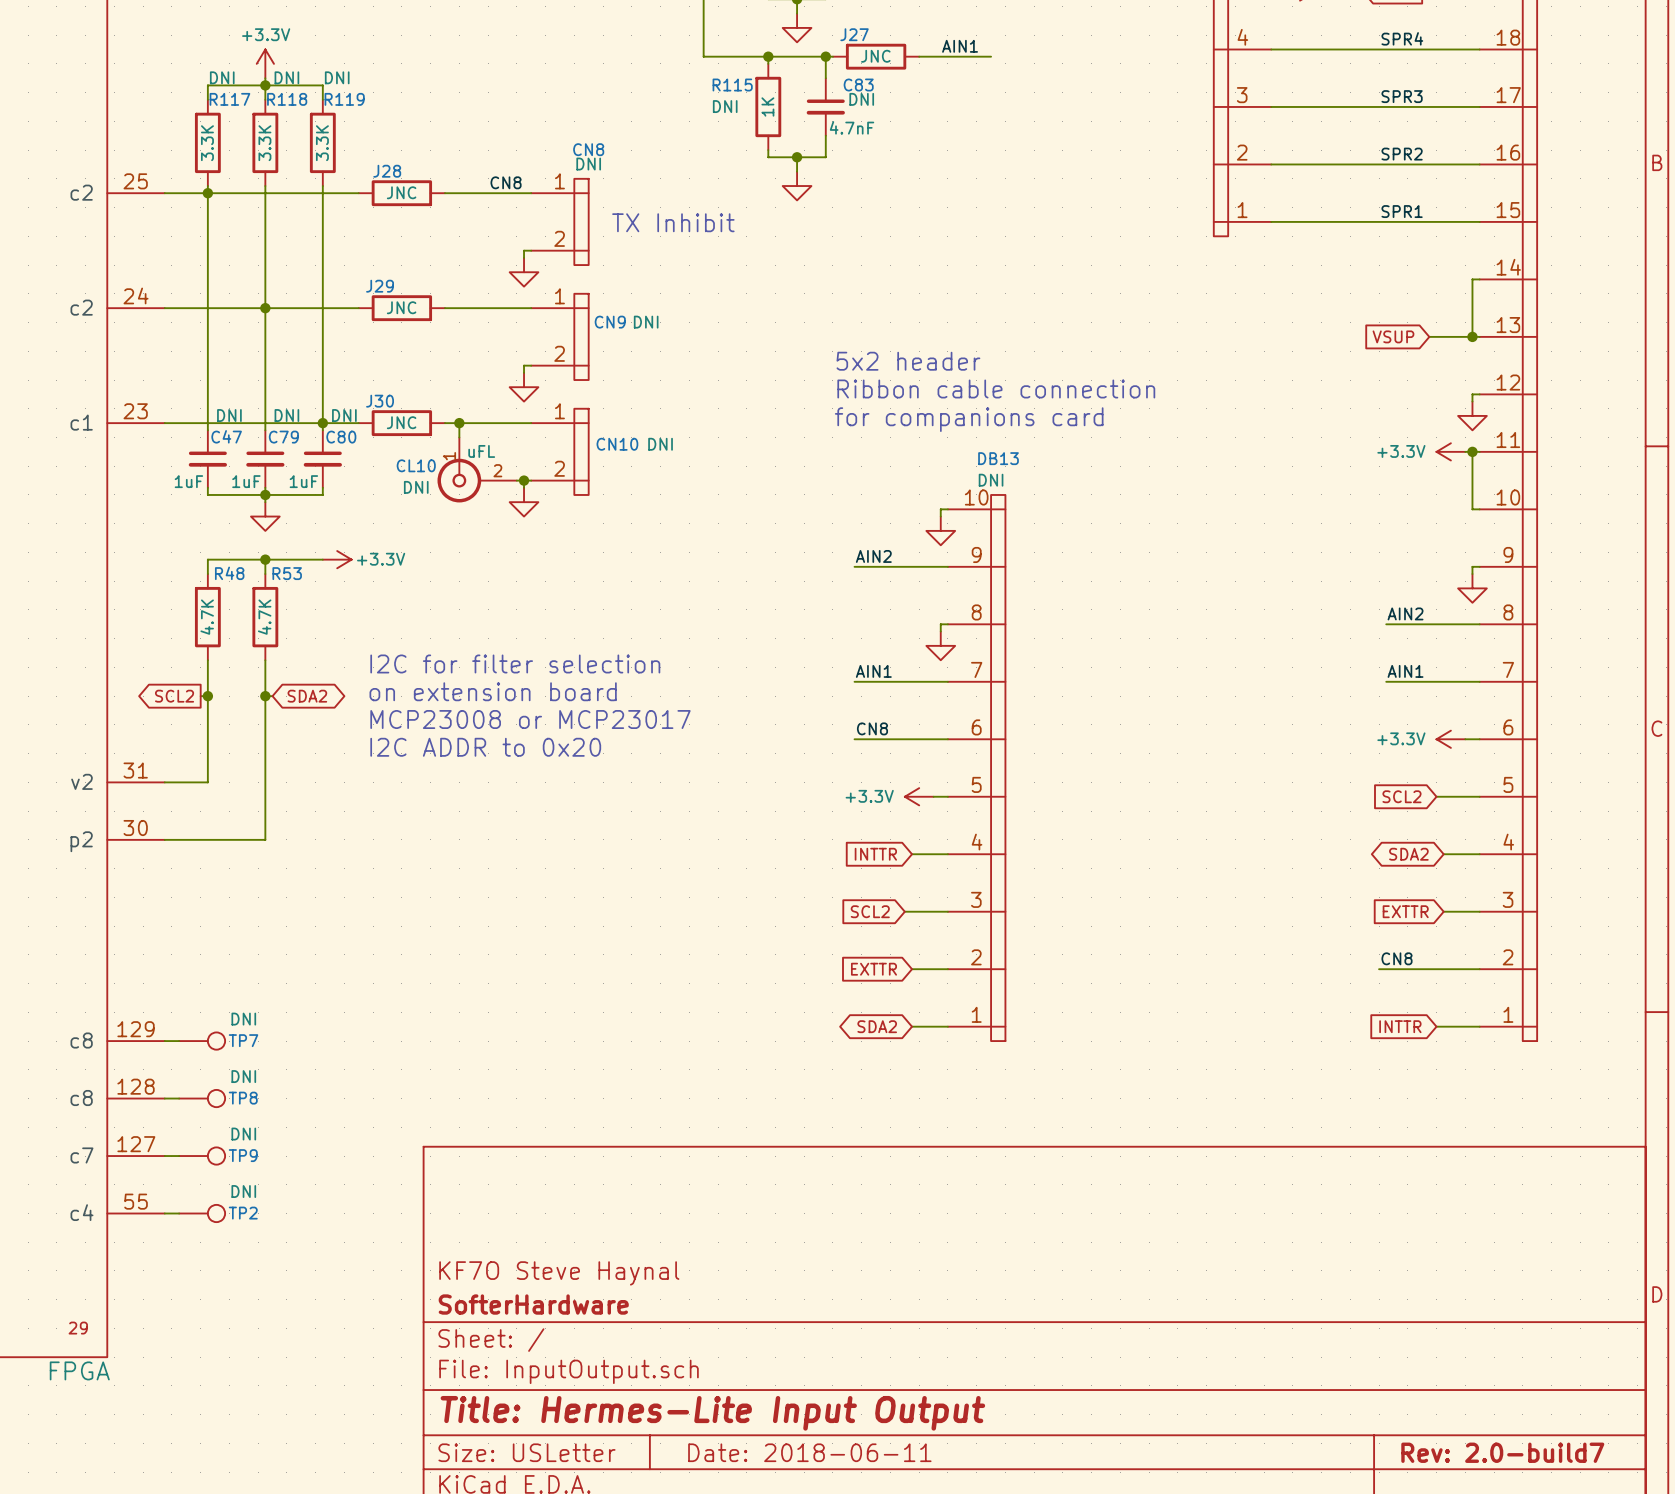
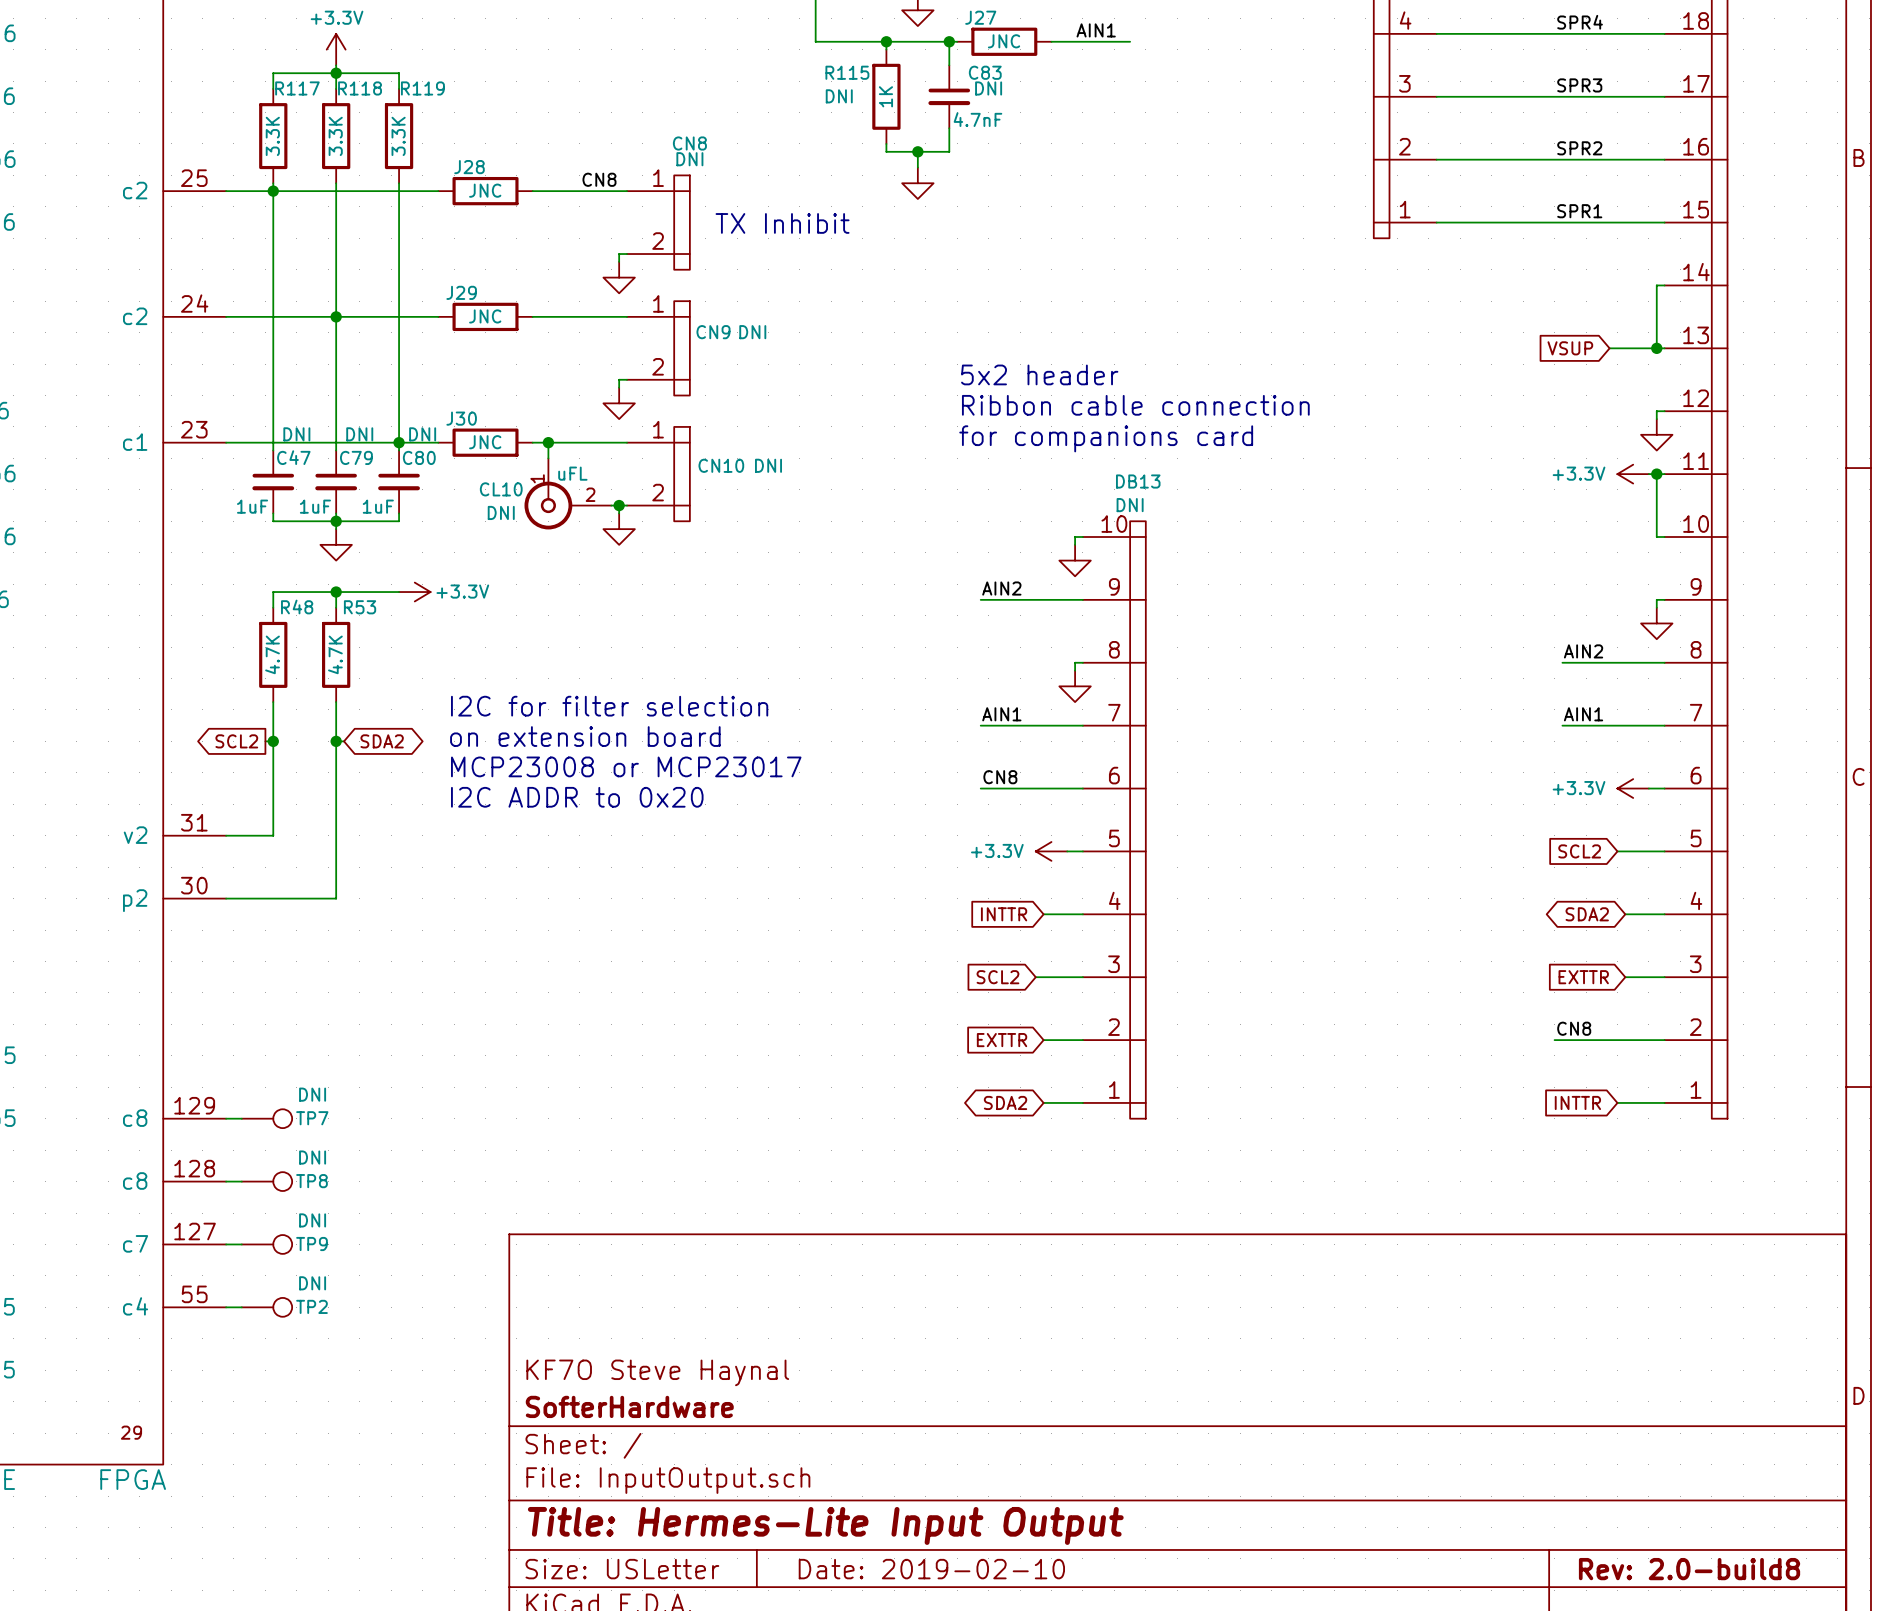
R117 text: DNI (222, 77) -> none
R118 text: DNI (286, 77) -> none
R119 text: DNI (337, 77) -> none
title block: Date: 2018-06-11 (809, 1452) -> Date: 2019-02-10 (931, 1569)
title block: Rev: 2.0-build7 (1502, 1452) -> Rev: 2.0-build8 (1689, 1569)

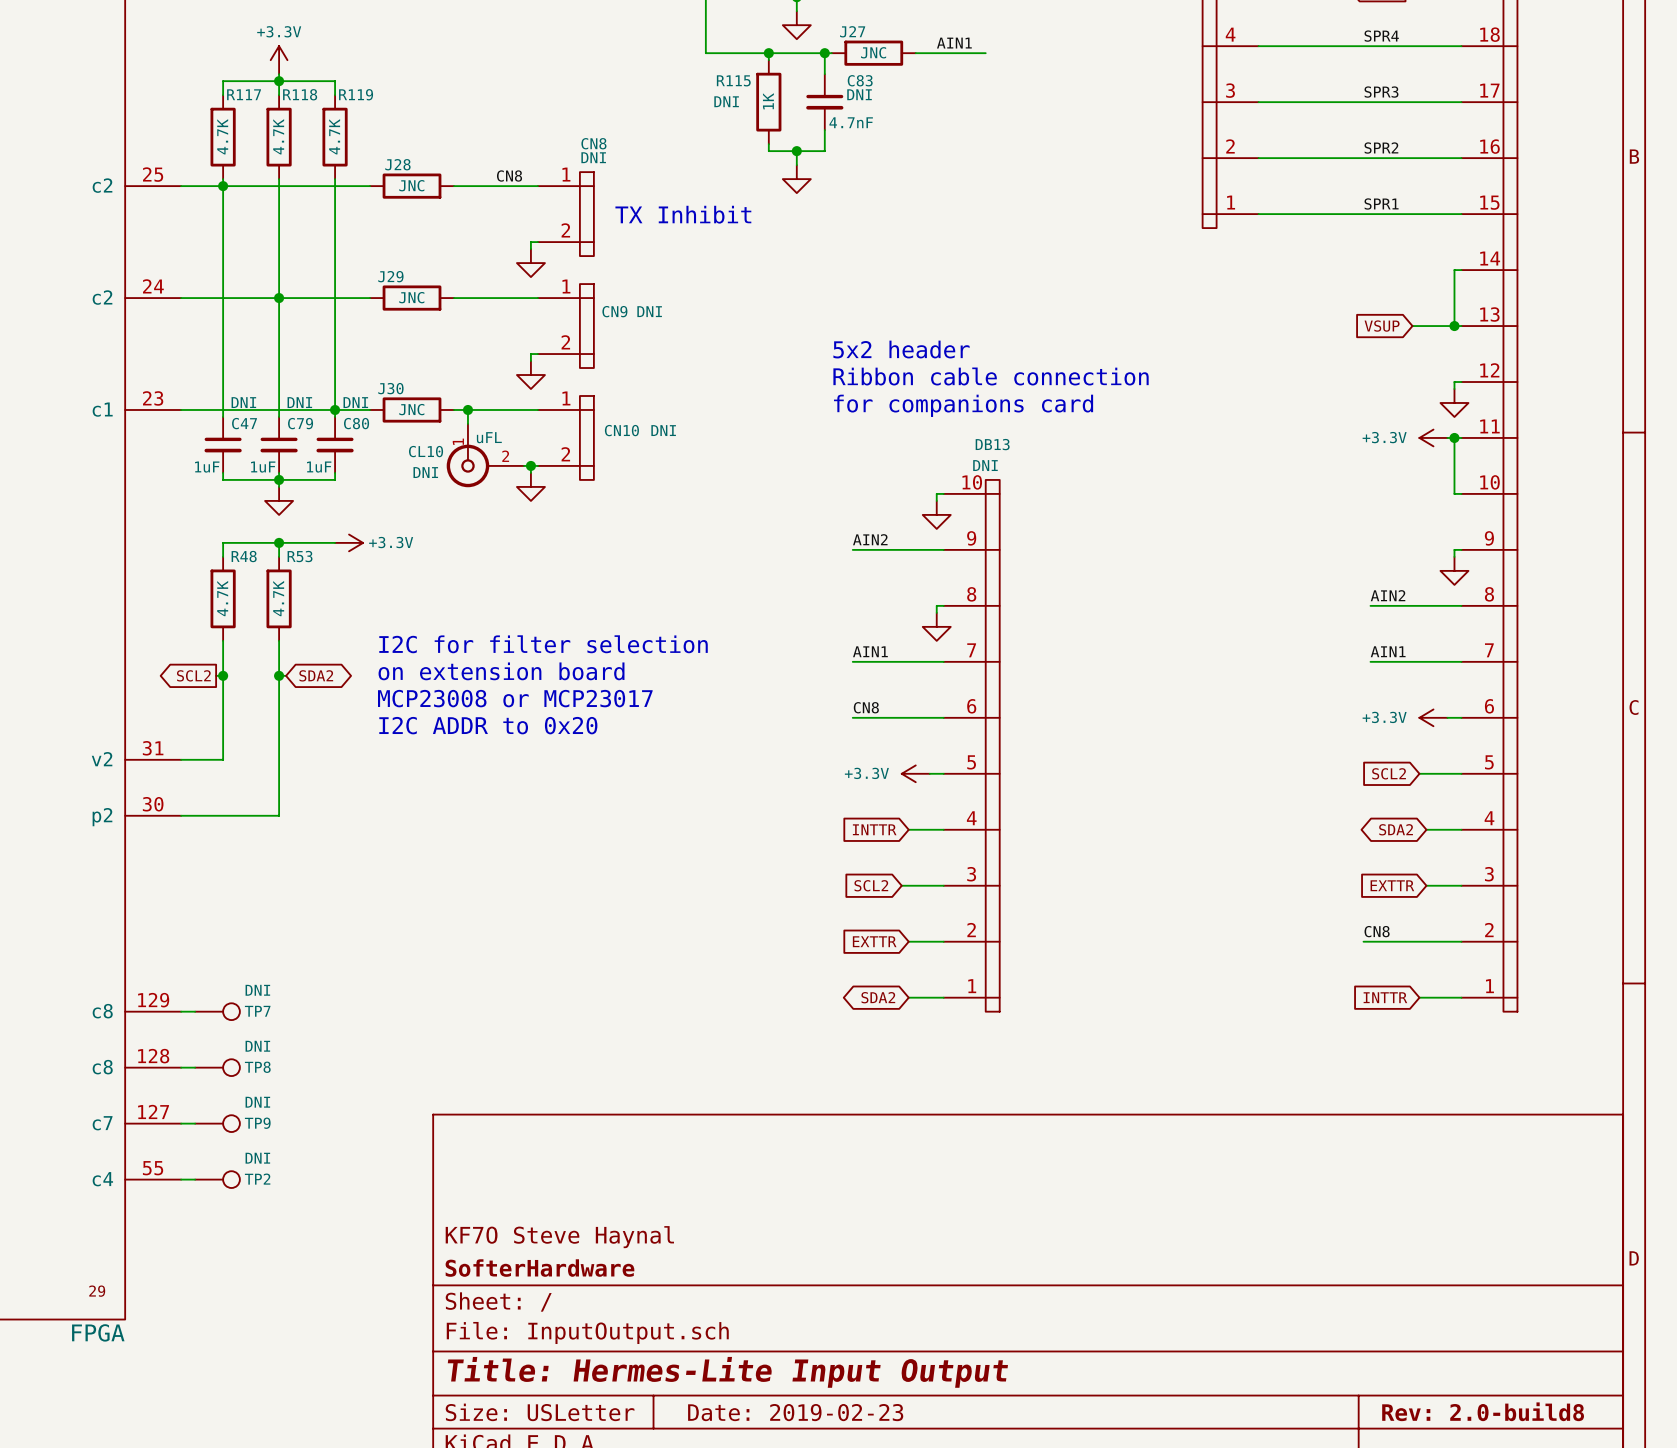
R117 value: 3.3K (272, 136) -> 4.7K (222, 136)
R118 value: 3.3K (335, 136) -> 4.7K (278, 136)
R119 value: 3.3K (398, 136) -> 4.7K (334, 136)
title block: Date: 2019-02-10 (931, 1569) -> Date: 2019-02-23 (795, 1412)

